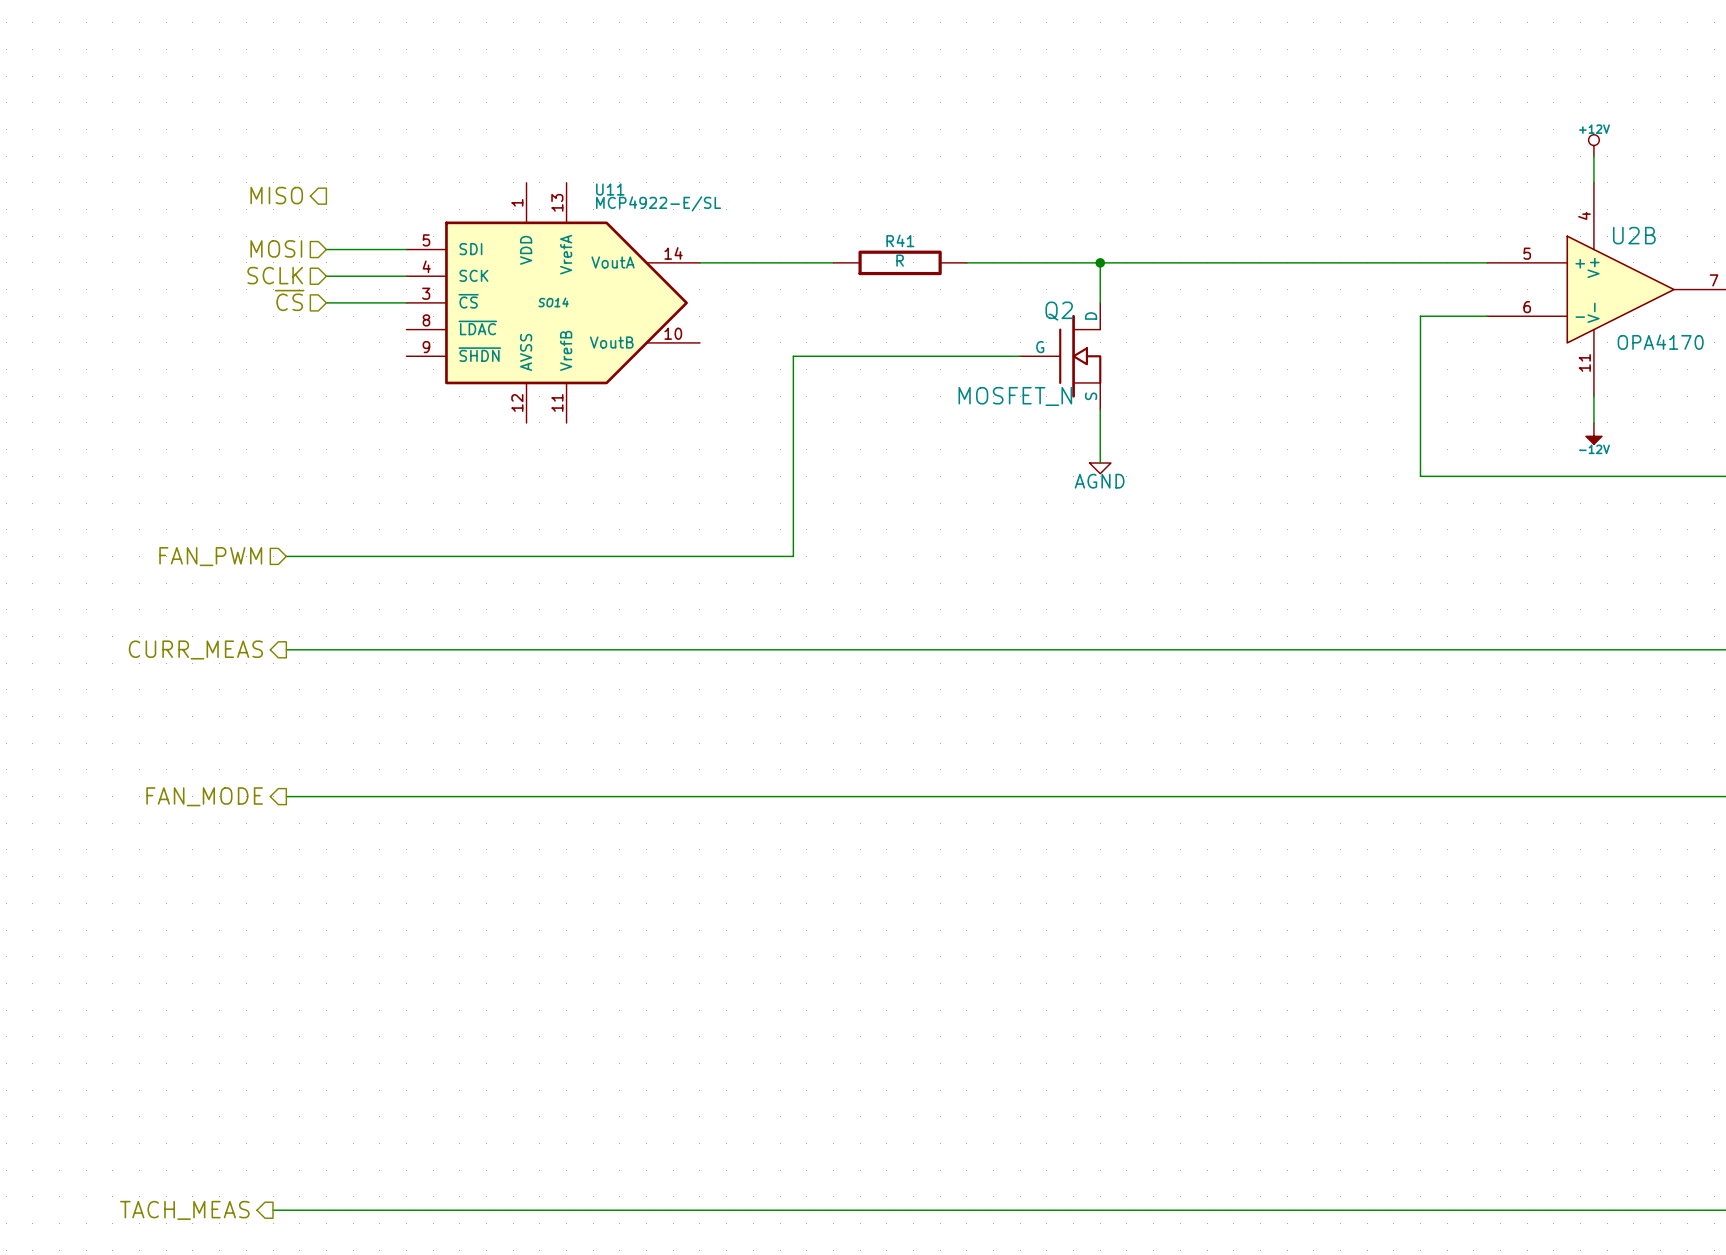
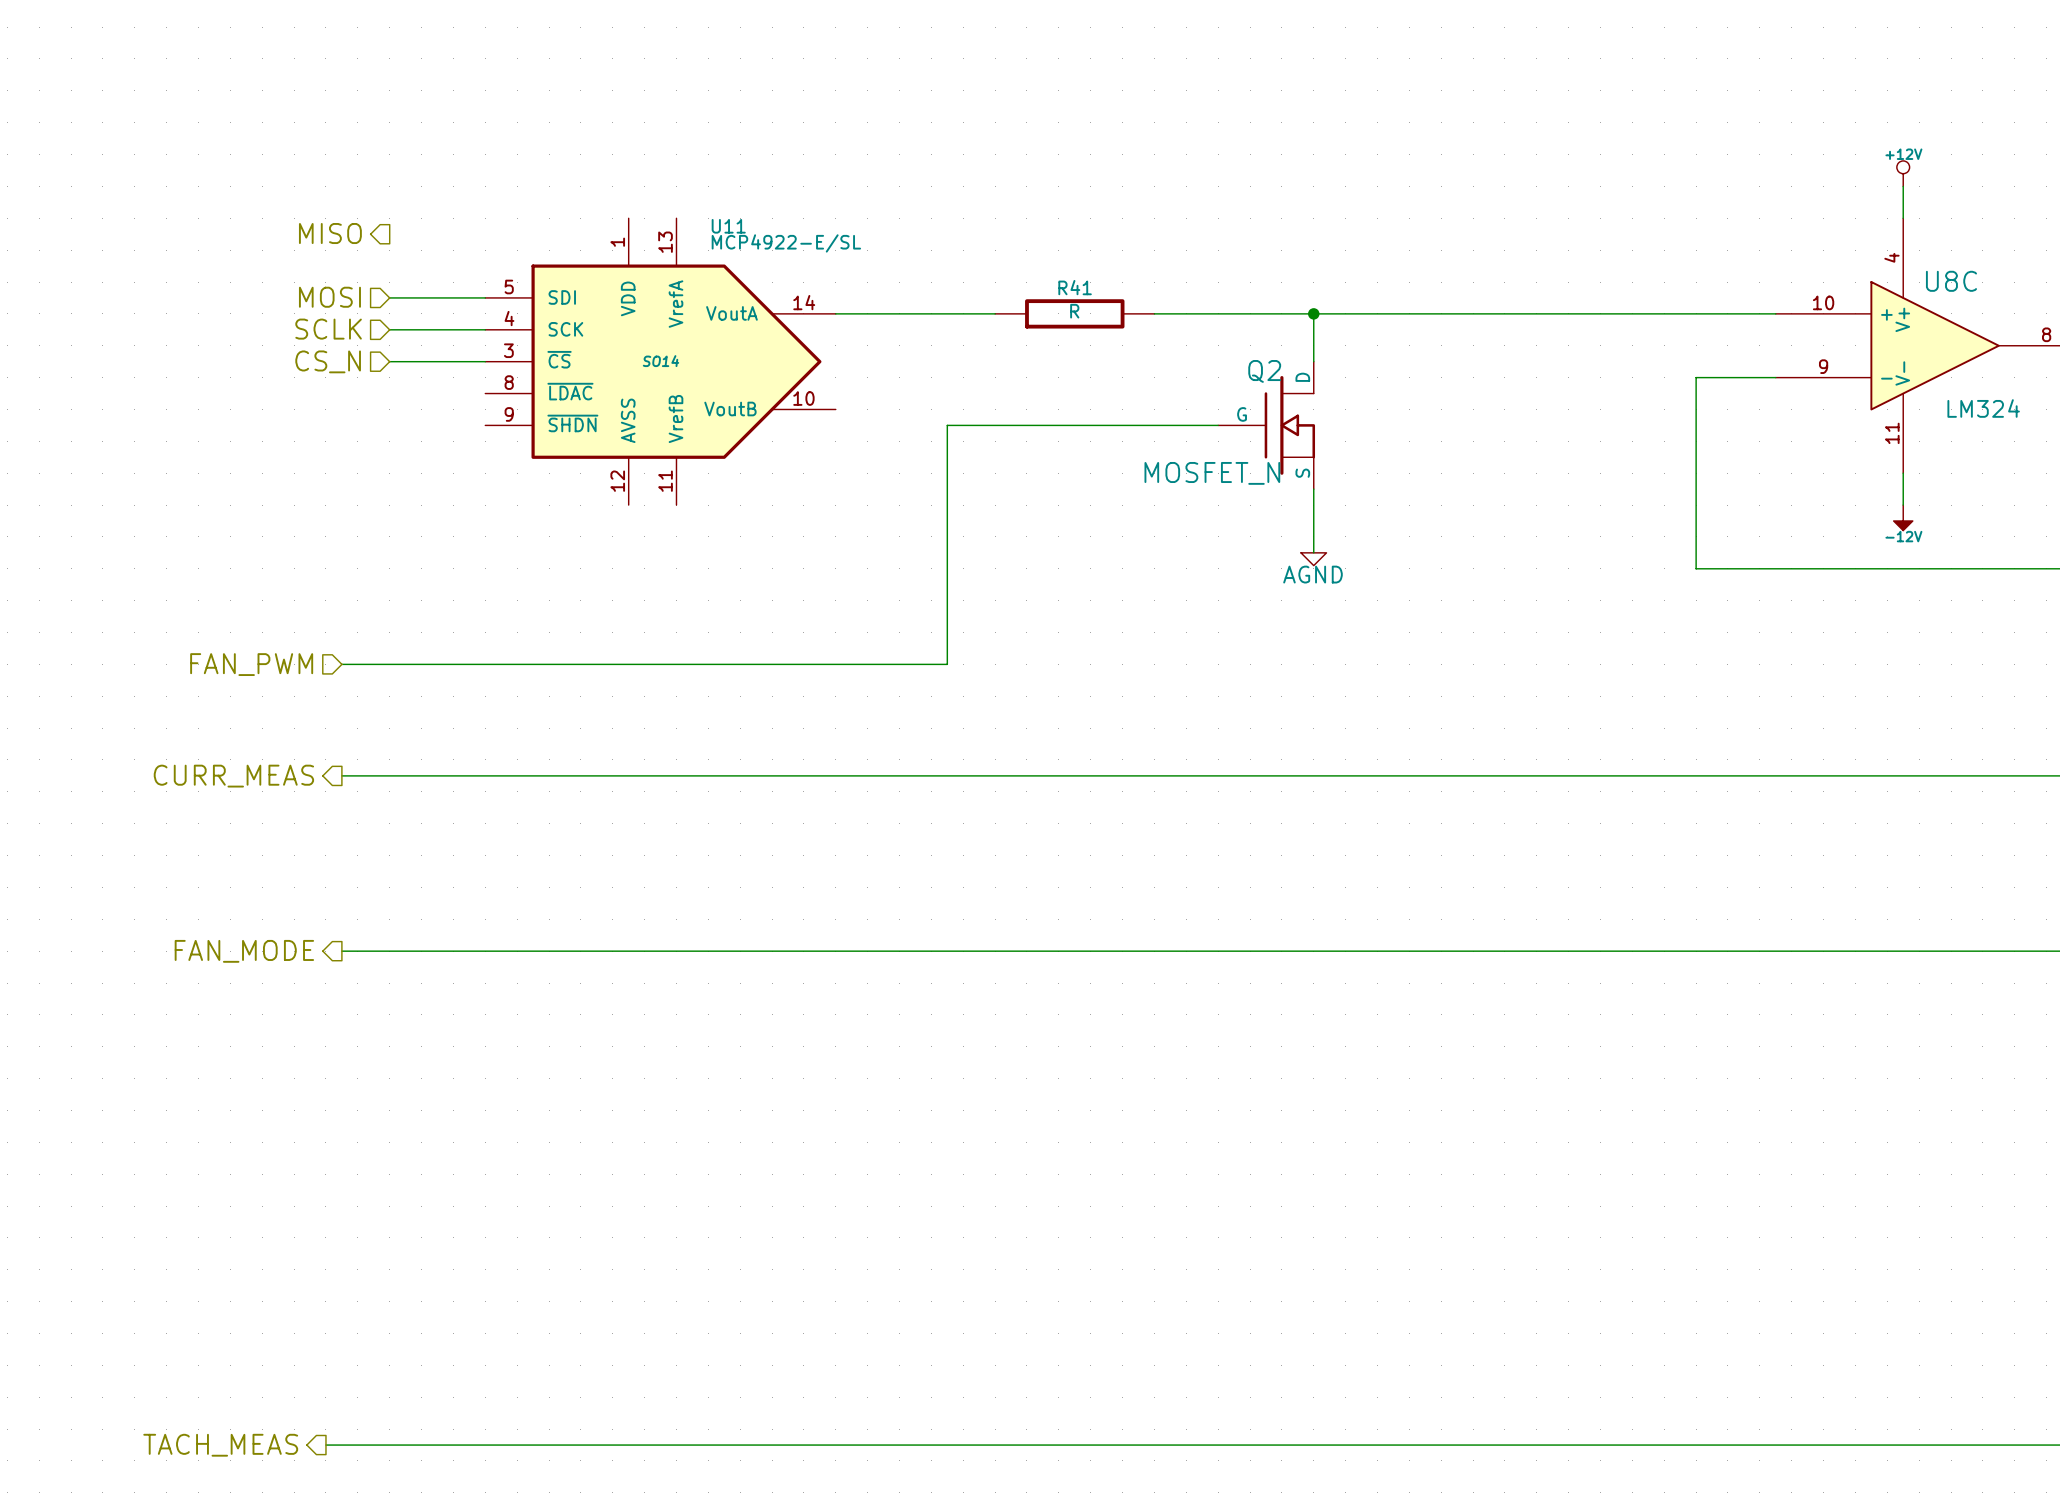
U2B name: U2B (1634, 235) -> U8C (1951, 281)
U2B pin number: 5 (1527, 253) -> 10 (1823, 302)
U2B pin number: 7 (1714, 280) -> 8 (2046, 334)
hierarchical label: ~{CS} (289, 300) -> CS_N (328, 361)
U2B pin number: 6 (1527, 307) -> 9 (1823, 366)
U2B value: OPA4170 (1660, 342) -> LM324 (1983, 408)

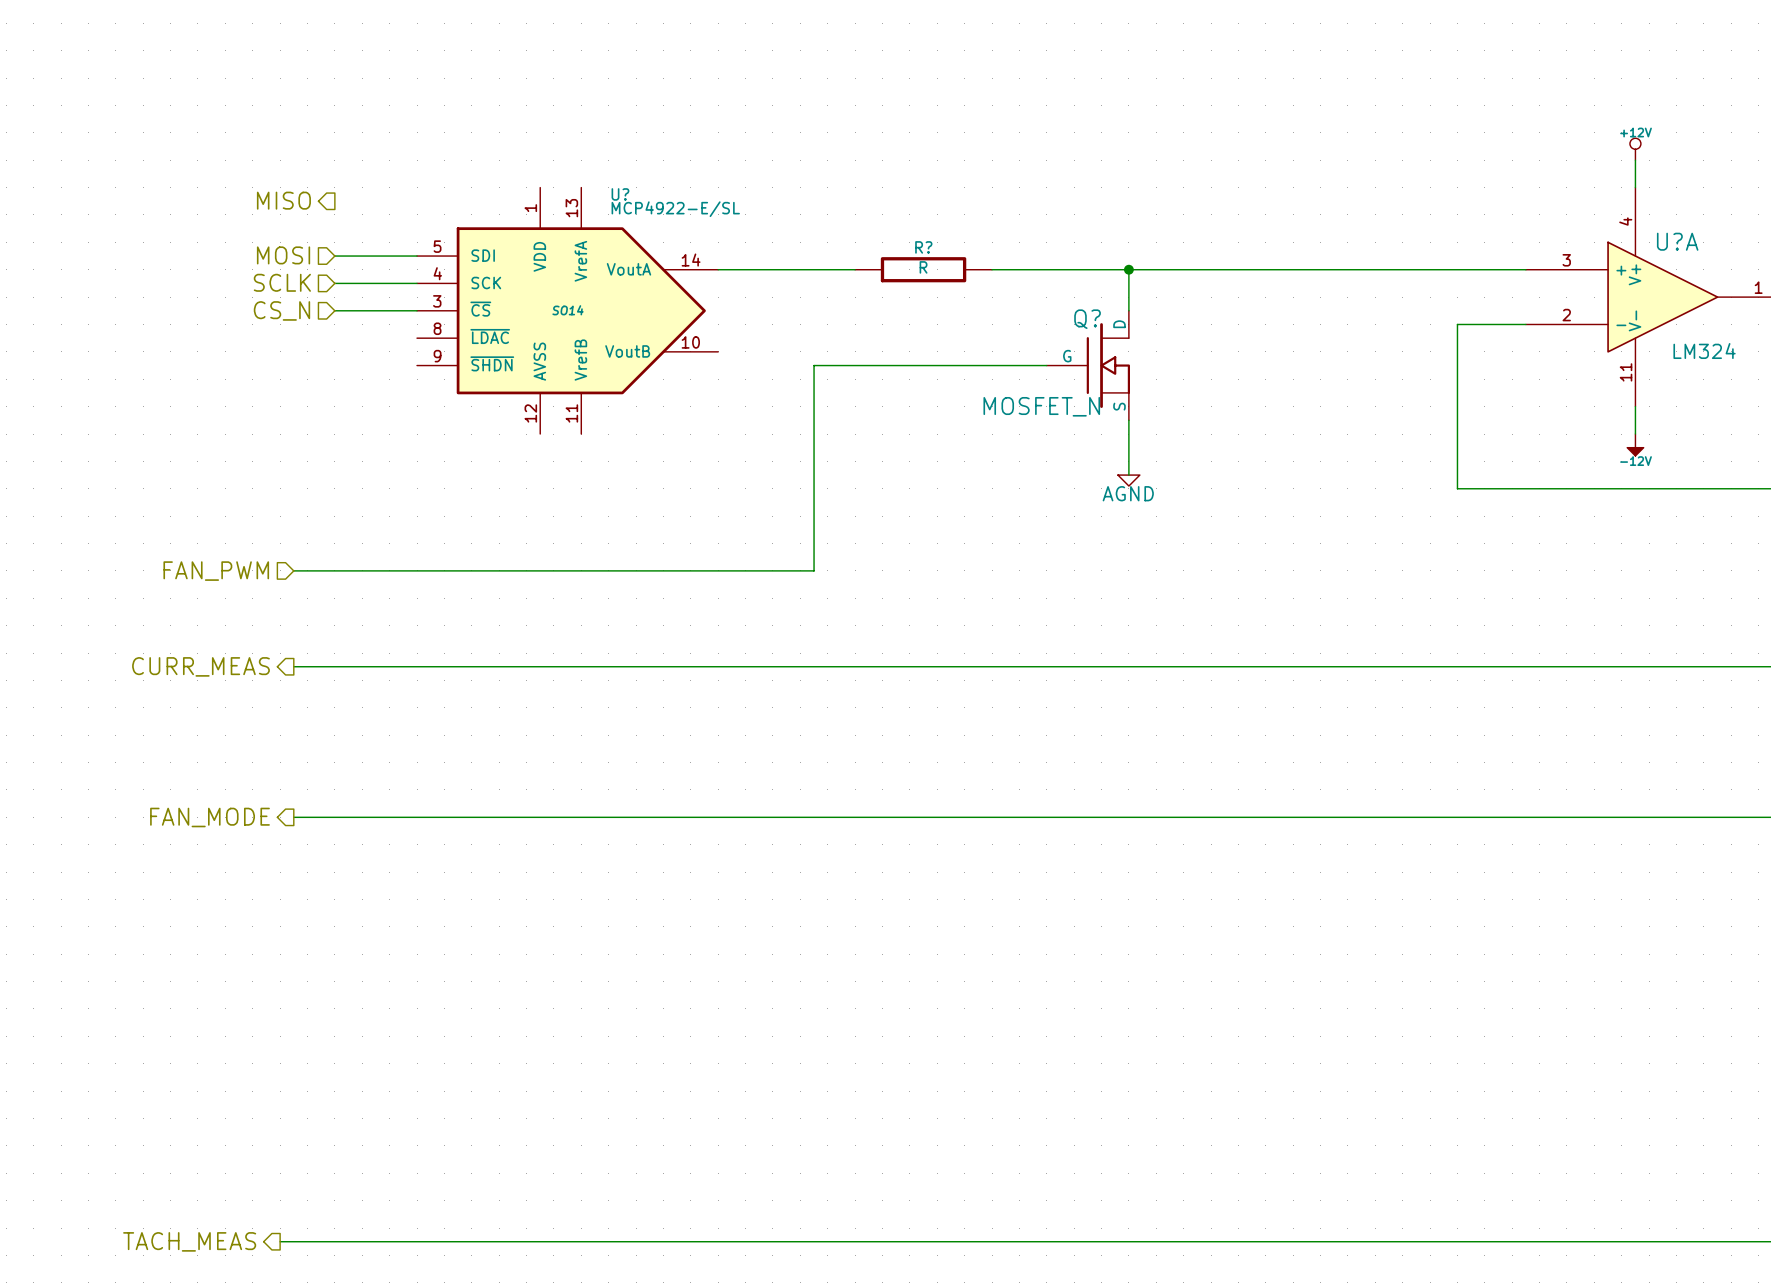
U11 name: U11 (728, 226) -> U? (620, 194)
U8C name: U8C (1951, 281) -> U?A (1677, 241)
R41 name: R41 (1075, 287) -> R? (923, 247)
U8C pin number: 10 (1823, 302) -> 3 (1566, 260)
U8C pin number: 8 (2046, 334) -> 1 (1758, 287)
U8C pin number: 9 (1823, 366) -> 2 (1566, 315)
Q2 name: Q2 (1264, 371) -> Q? (1087, 319)

